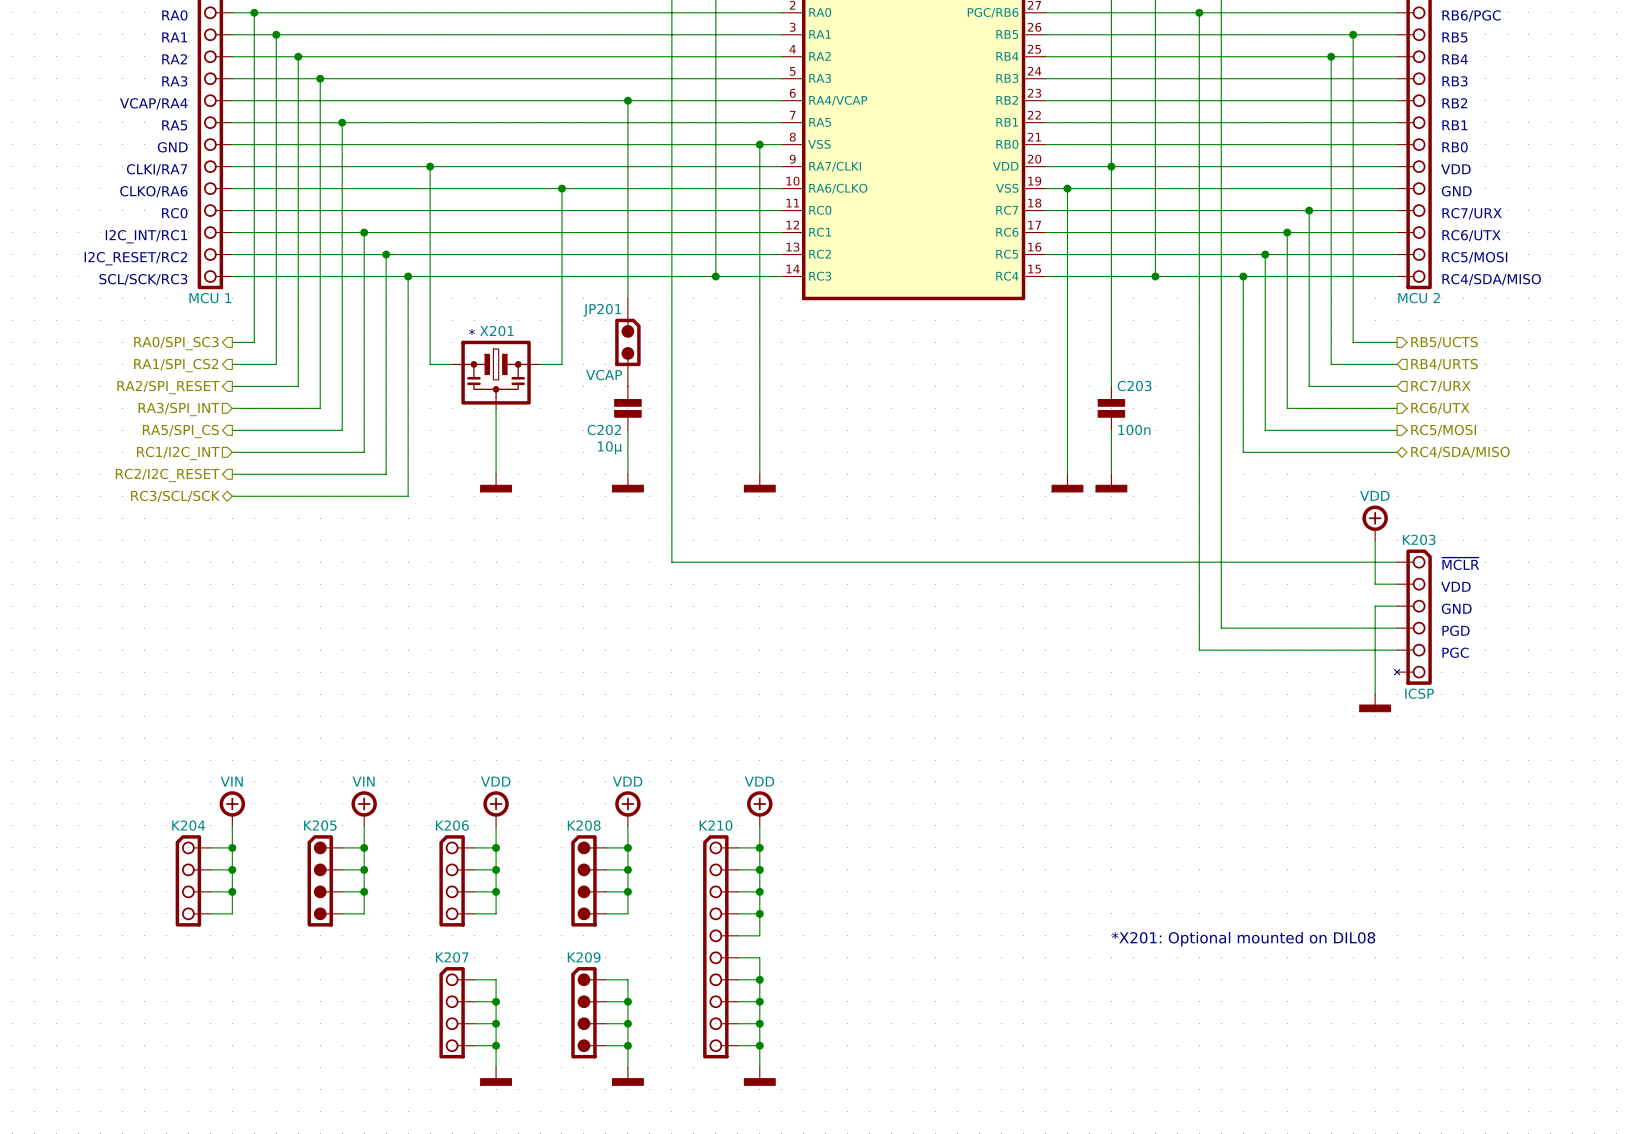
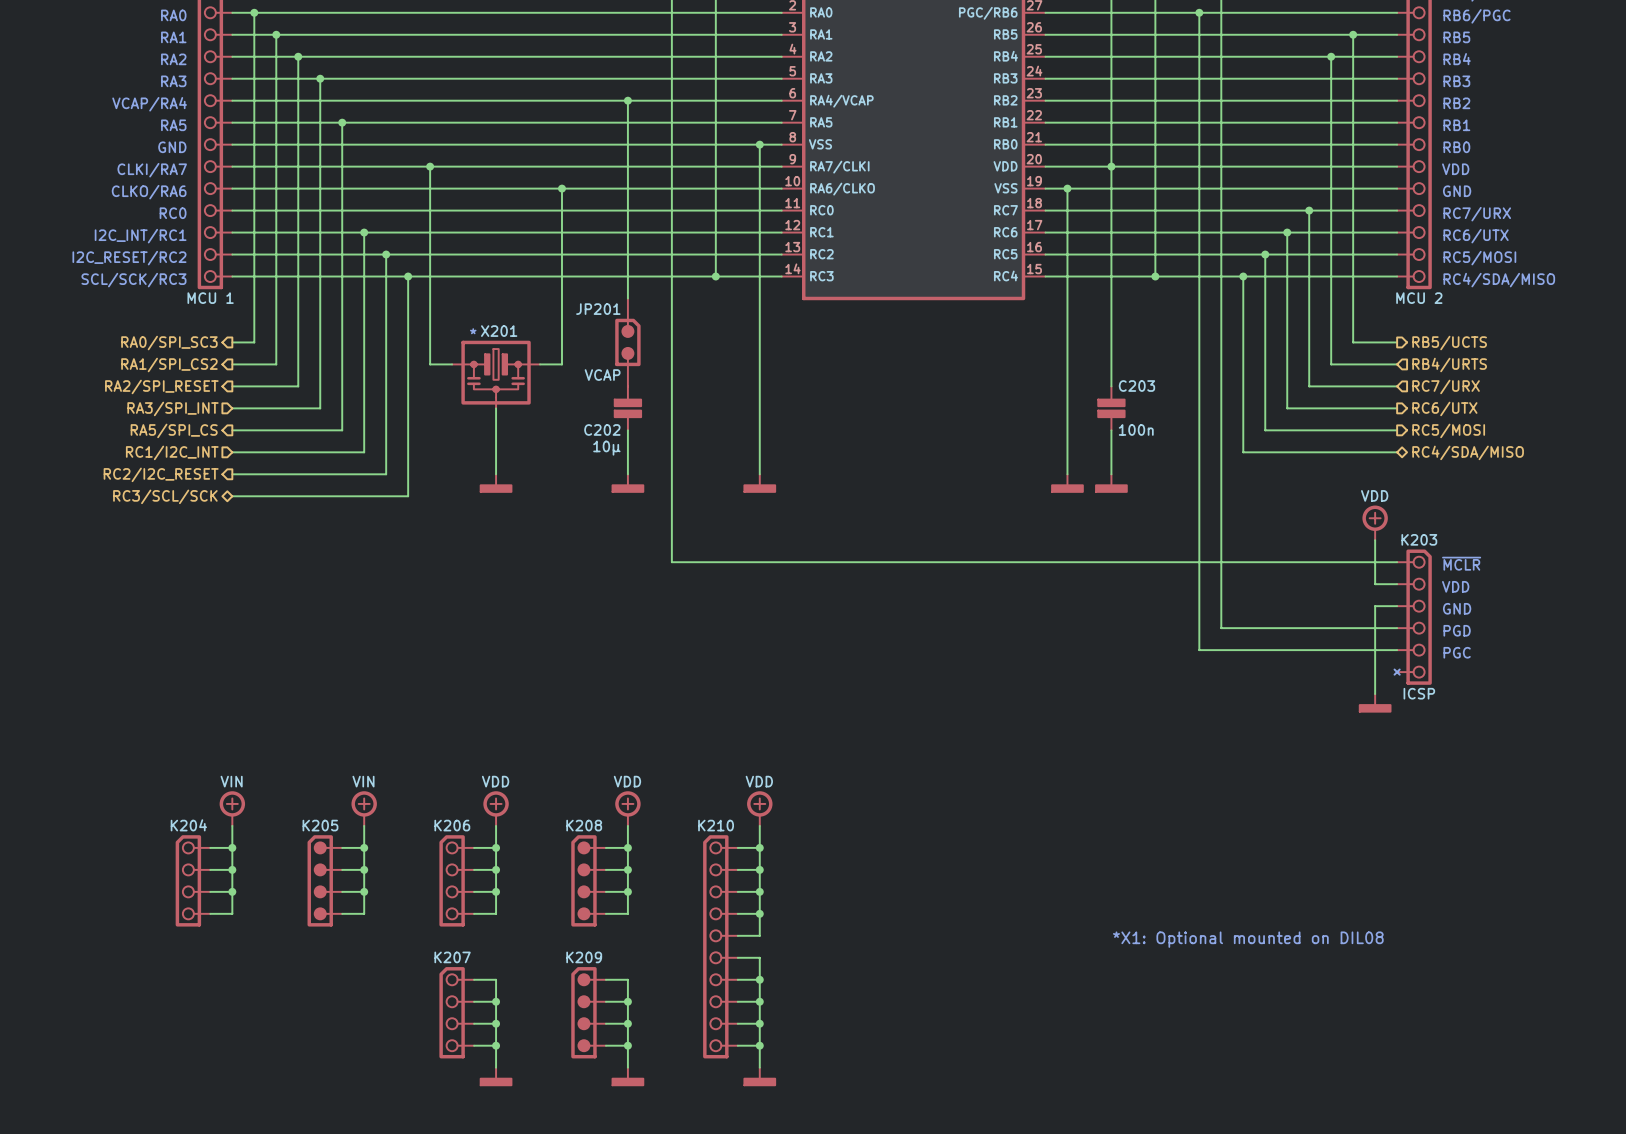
text: *X201: Optional mounted on DIL08 (1243, 939) -> *X1: Optional mounted on DIL08 (1248, 939)

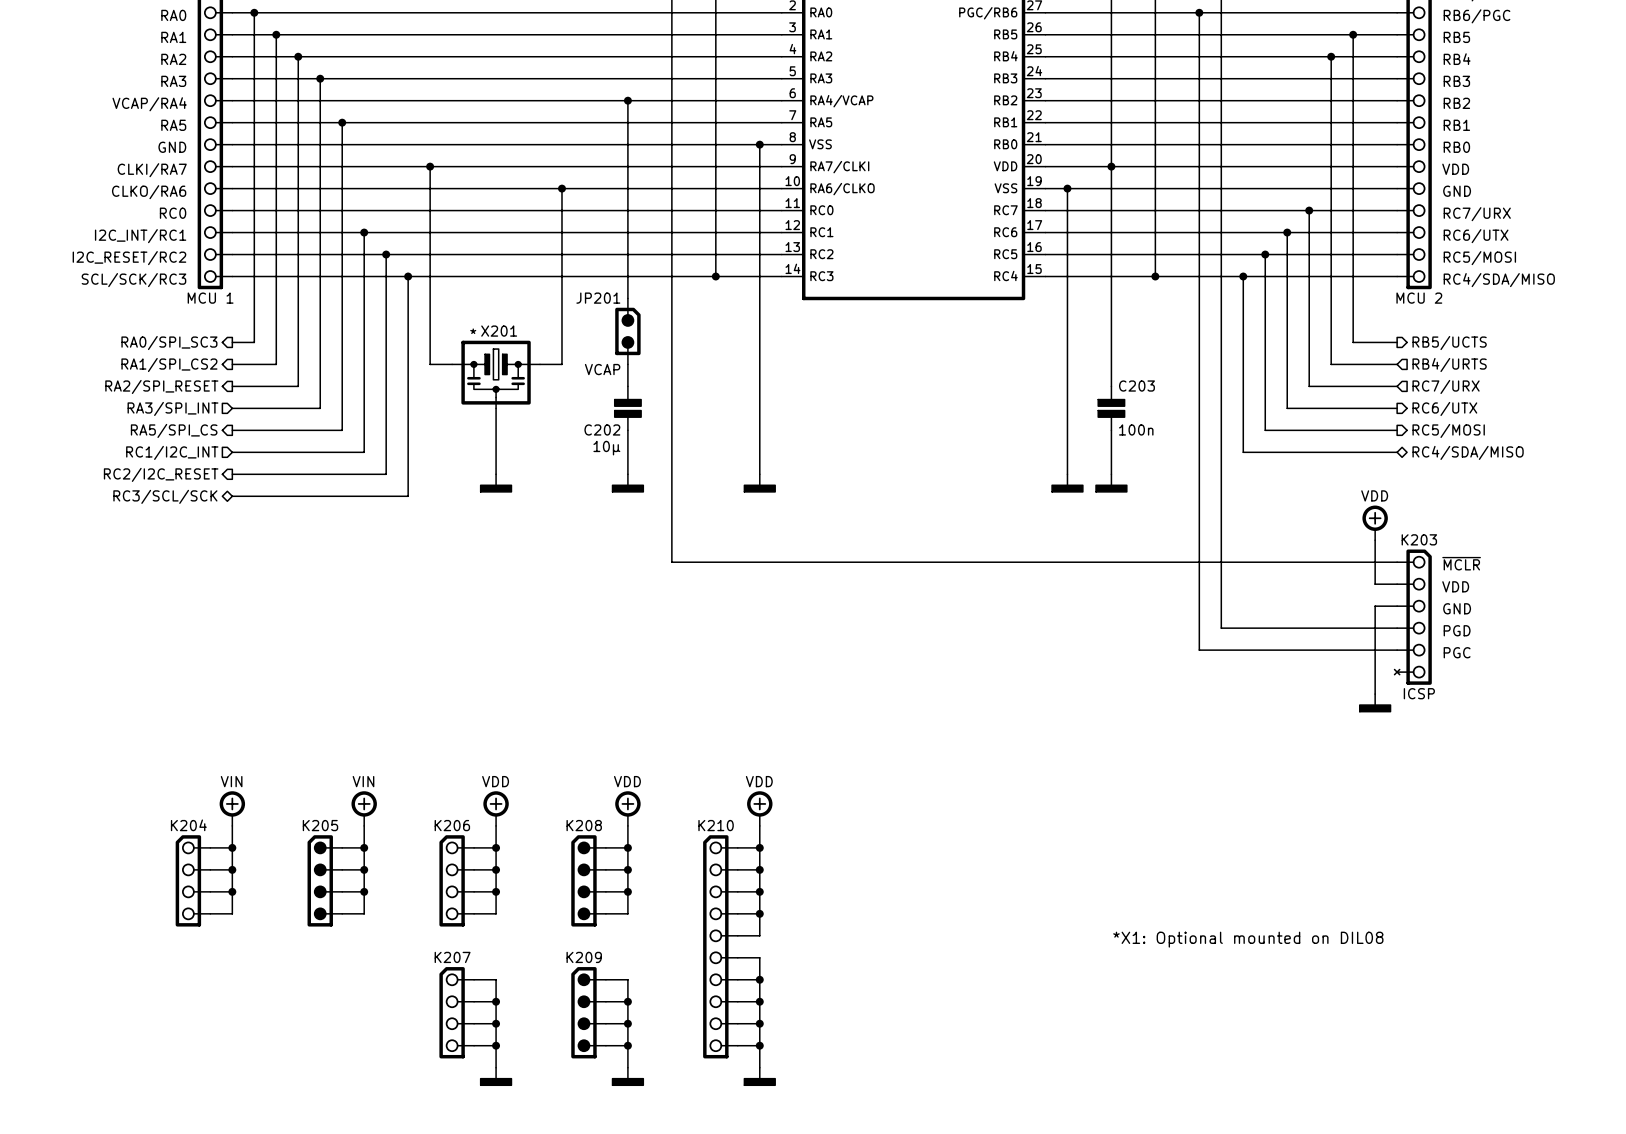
JP201 symbol: [615, 298, 641, 387] -> [615, 298, 641, 365]

